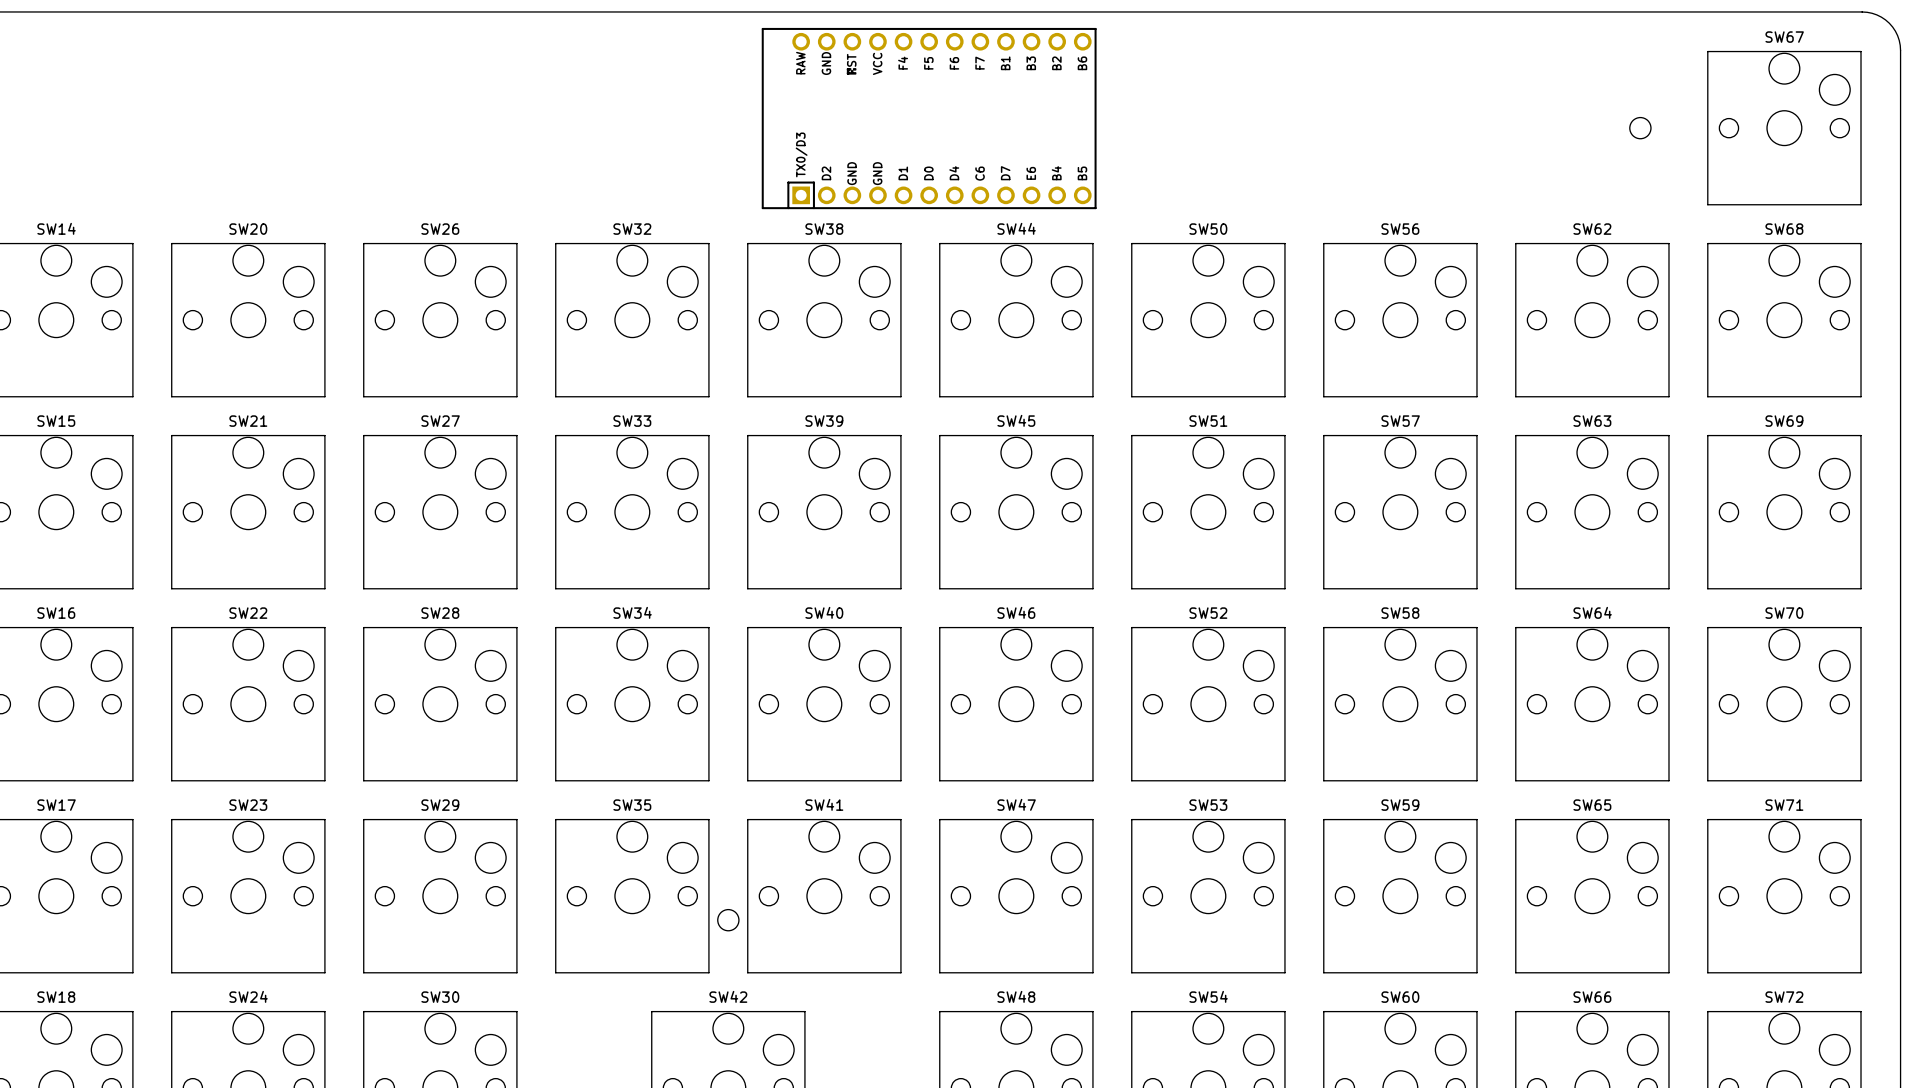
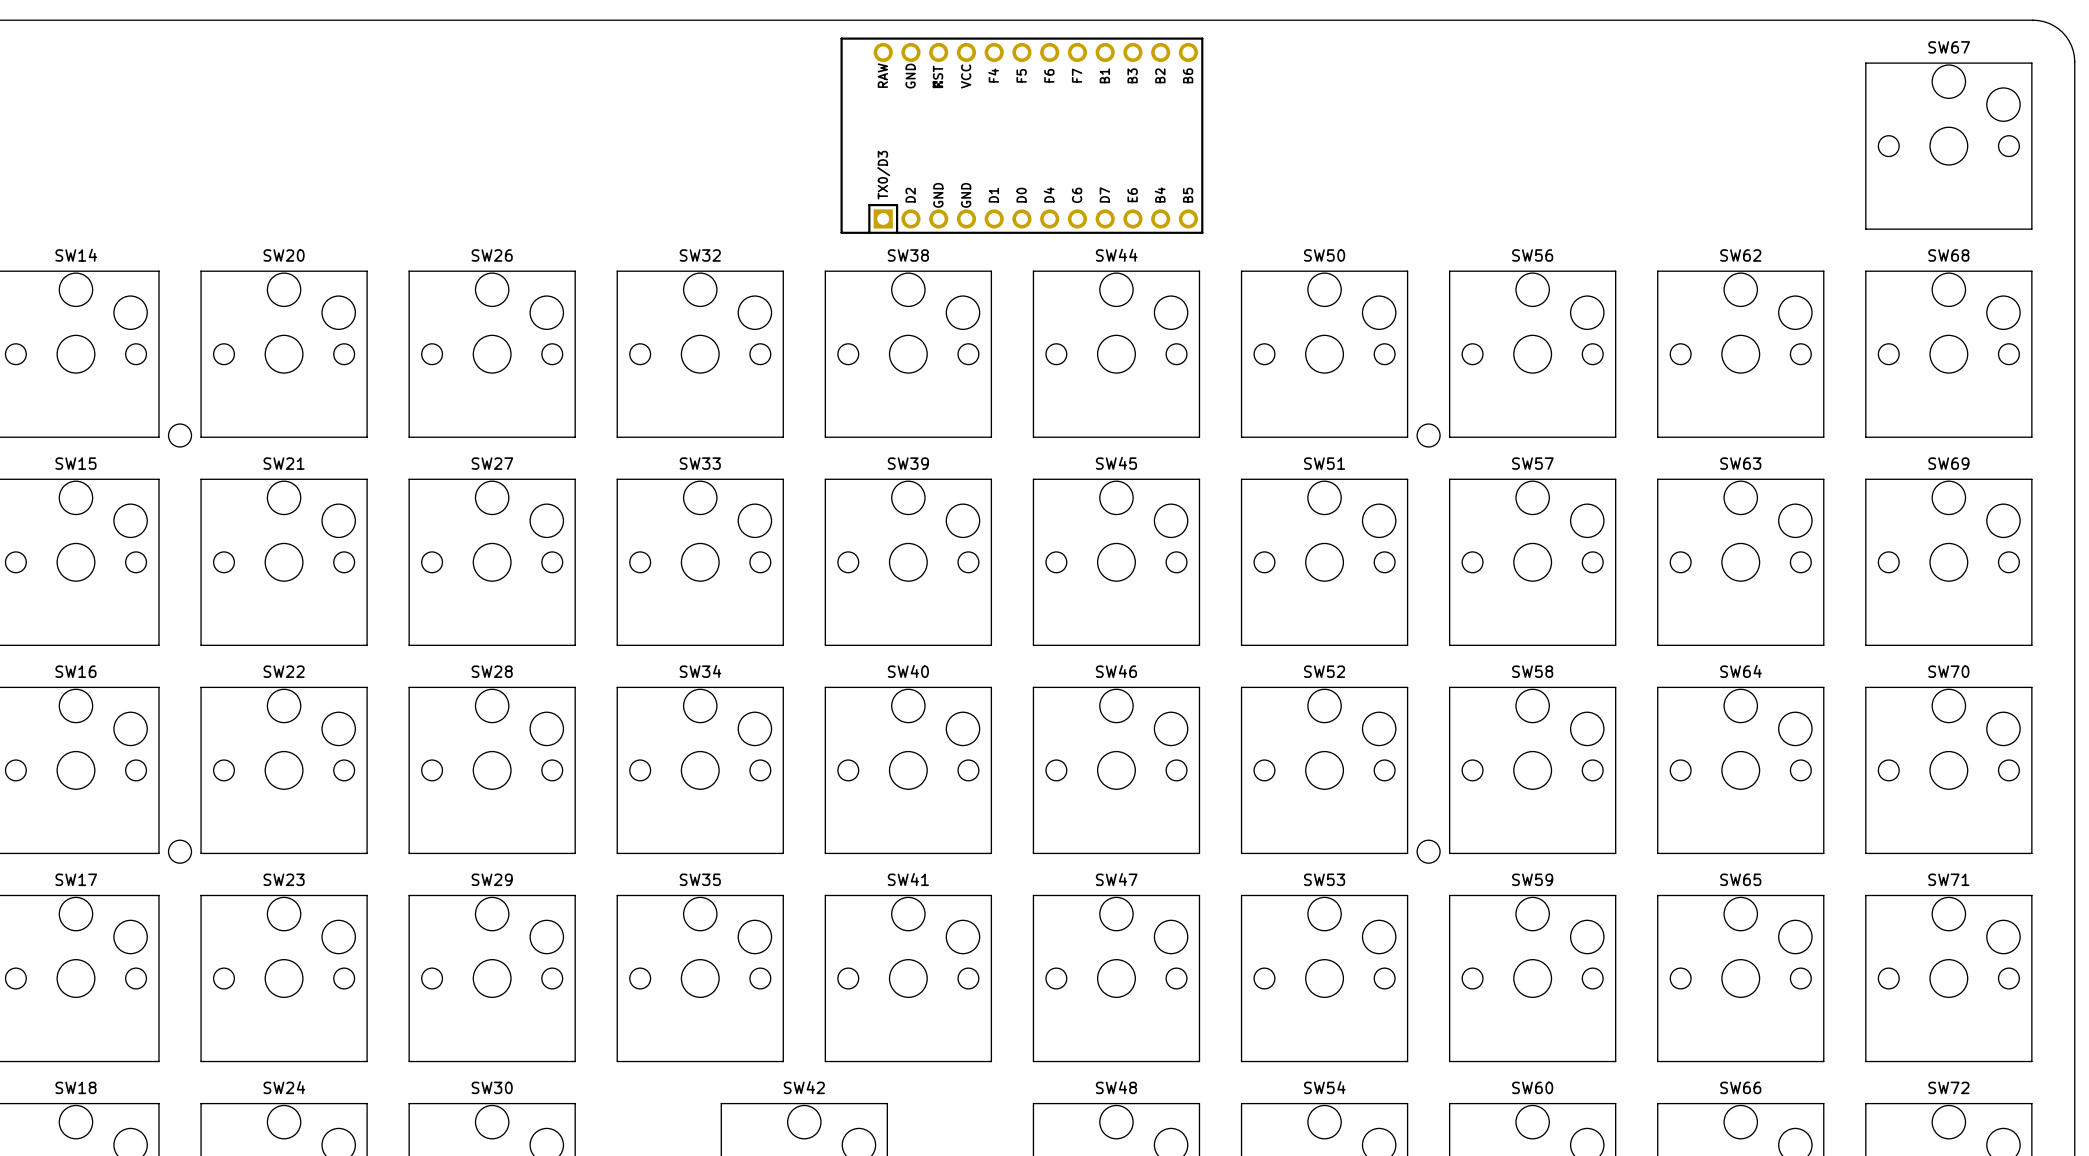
round board edge: [1629, 117, 1652, 139] -> none
round board edge: none -> [168, 423, 192, 448]
round board edge: none -> [1416, 423, 1441, 448]
round board edge: none -> [168, 839, 192, 864]
round board edge: none -> [1416, 839, 1441, 864]
round board edge: [717, 909, 740, 932] -> none

